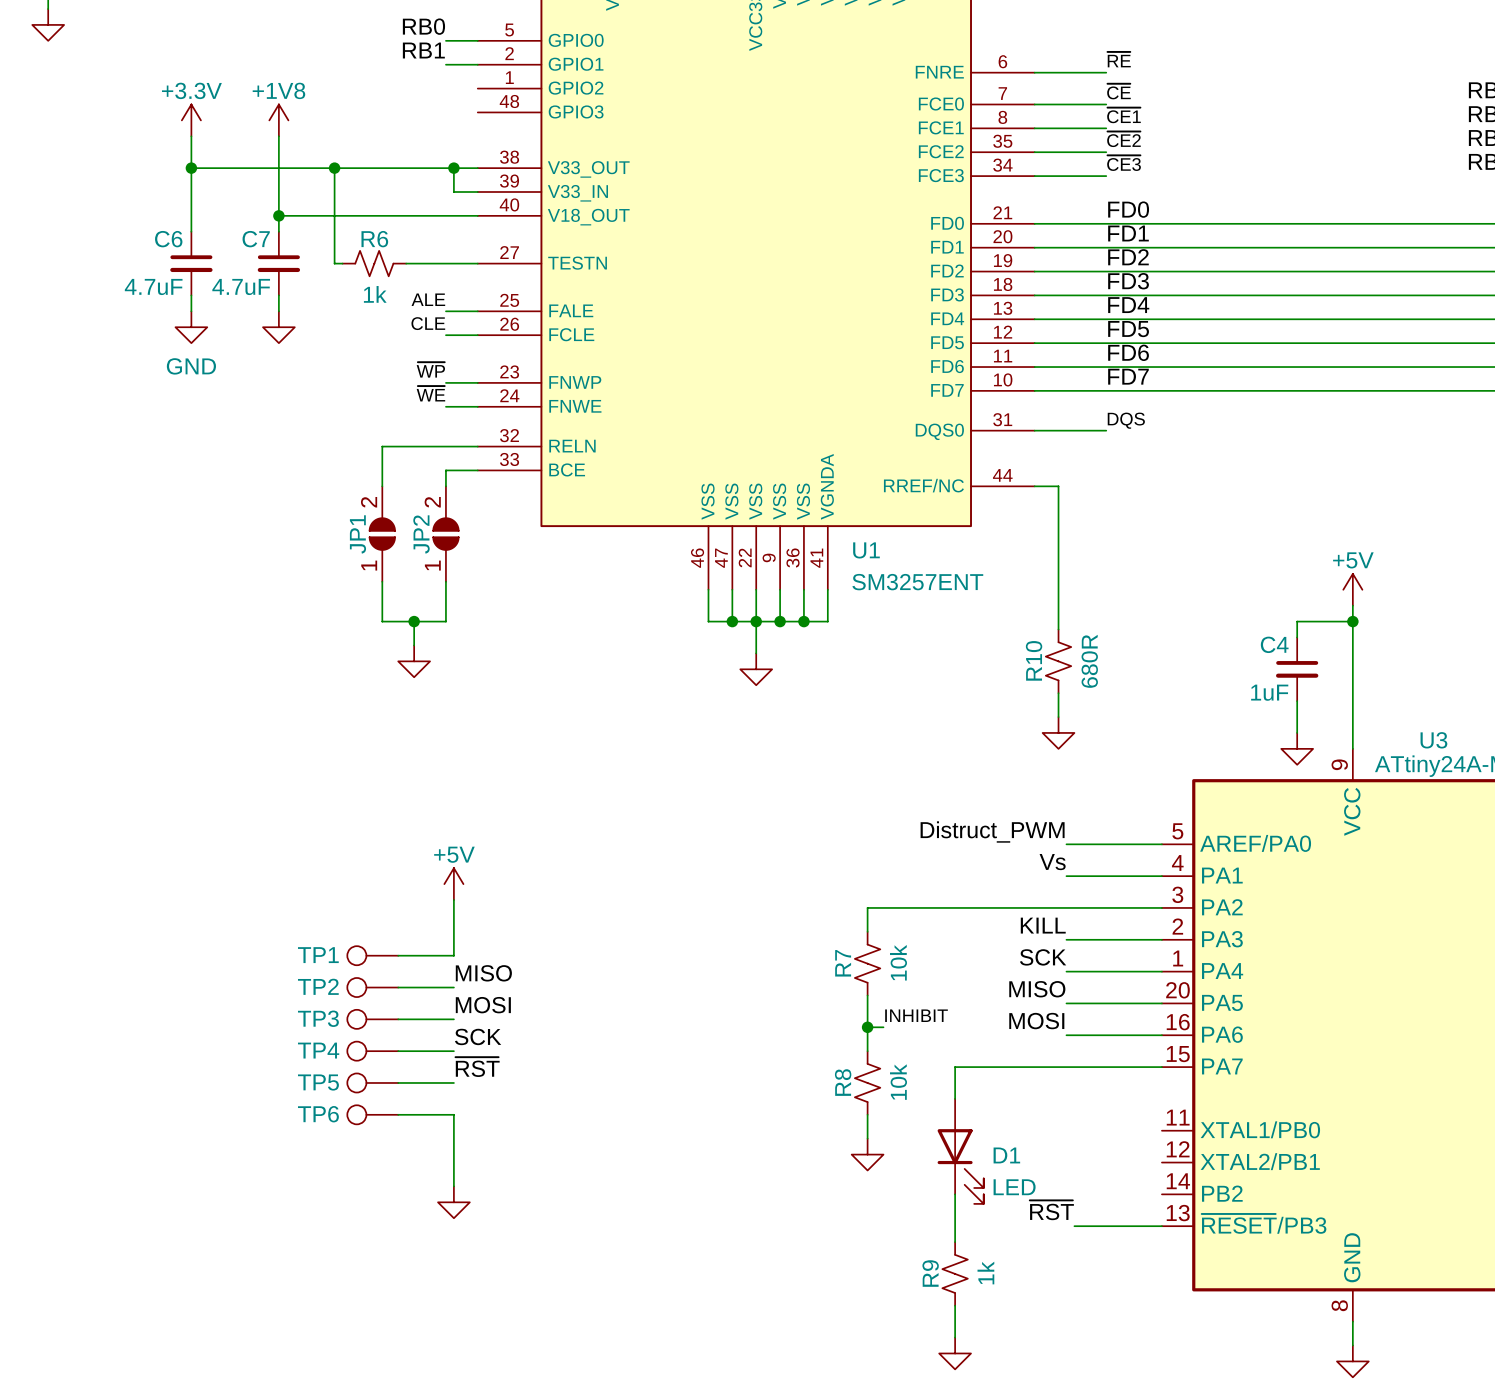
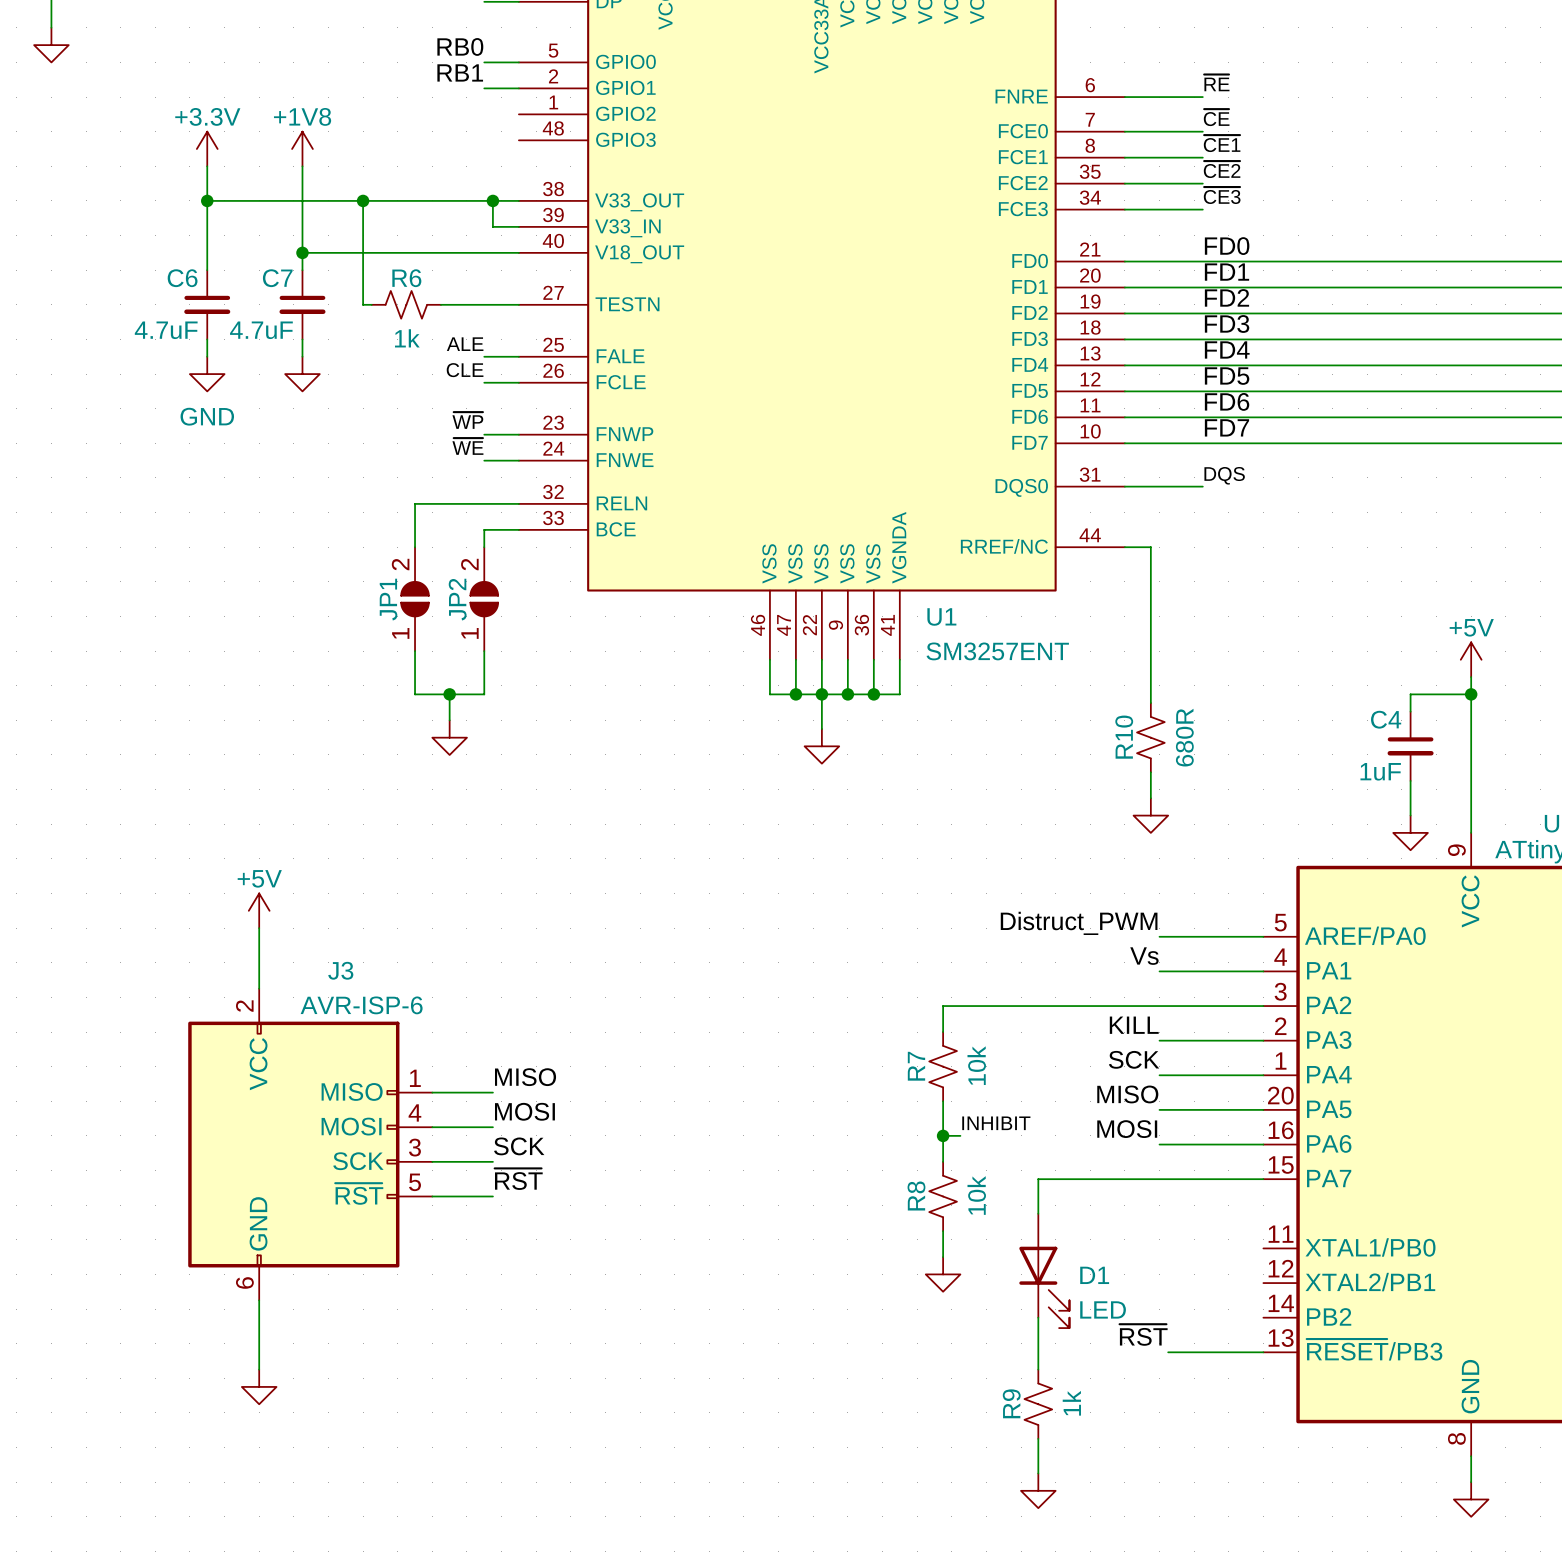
wire: none -> (259, 928) (259, 988)
power symbol position: +5V (453, 884) -> +5V (259, 910)
wire: (453, 900) (453, 955) (398, 955) -> none
TP1: (372, 955) -> none
TP2: (372, 987) -> none
TP3: (372, 1019) -> none
J3: none -> AVR-ISP-6 (310, 1144)
TP4: (372, 1051) -> none
TP5: (372, 1082) -> none
TP6: (372, 1114) -> none
wire: (398, 1114) (453, 1114) (453, 1186) -> none
wire: none -> (259, 1300) (259, 1369)
power symbol position: (453, 1202) -> (259, 1386)

